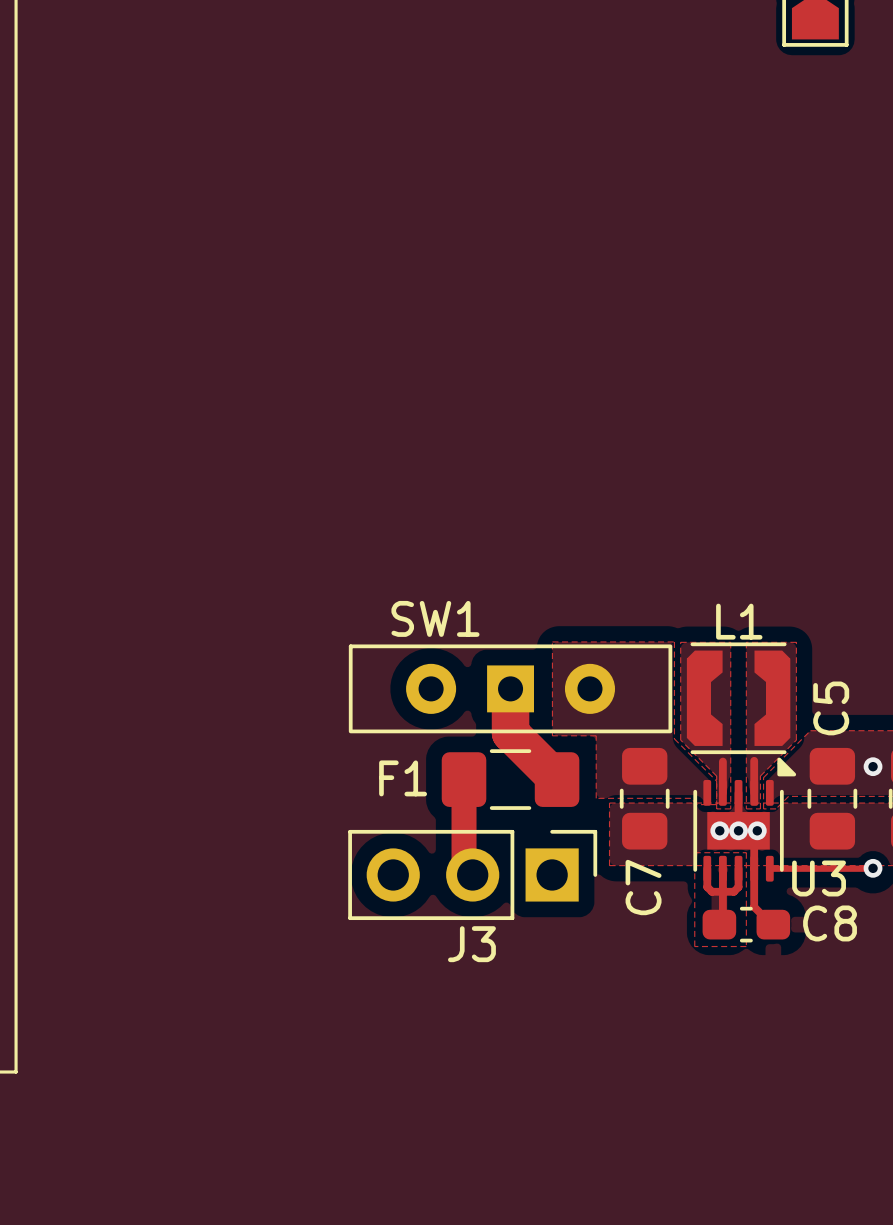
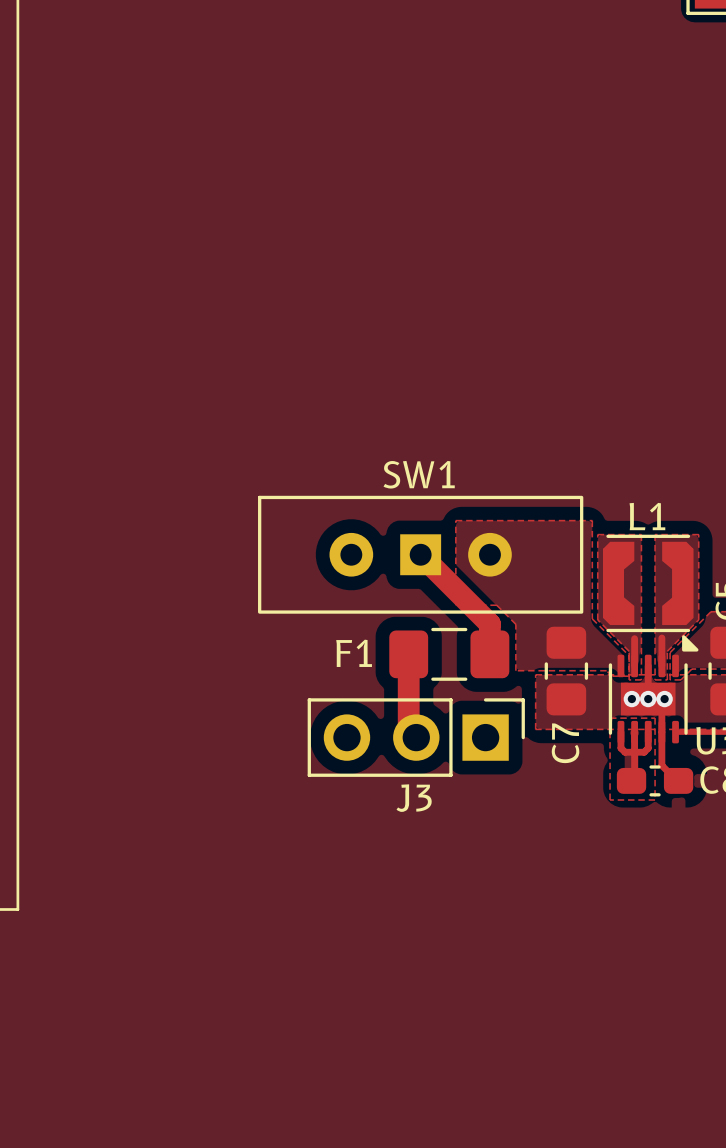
SW1 name position: SW1 (435, 618) -> SW1 (419, 474)
zone outline: (674, 641) (552, 641) (552, 735) (596, 735) (596, 798) -> (592, 534) (592, 520) (455, 520) (455, 605) (496, 605) (515, 624) (515, 670) (524, 670)
SW1 footprint: [348, 644, 673, 734] -> [258, 495, 584, 614]
track: (510, 688) (510, 733) (557, 779) -> (420, 554) (489, 623) (489, 654)

